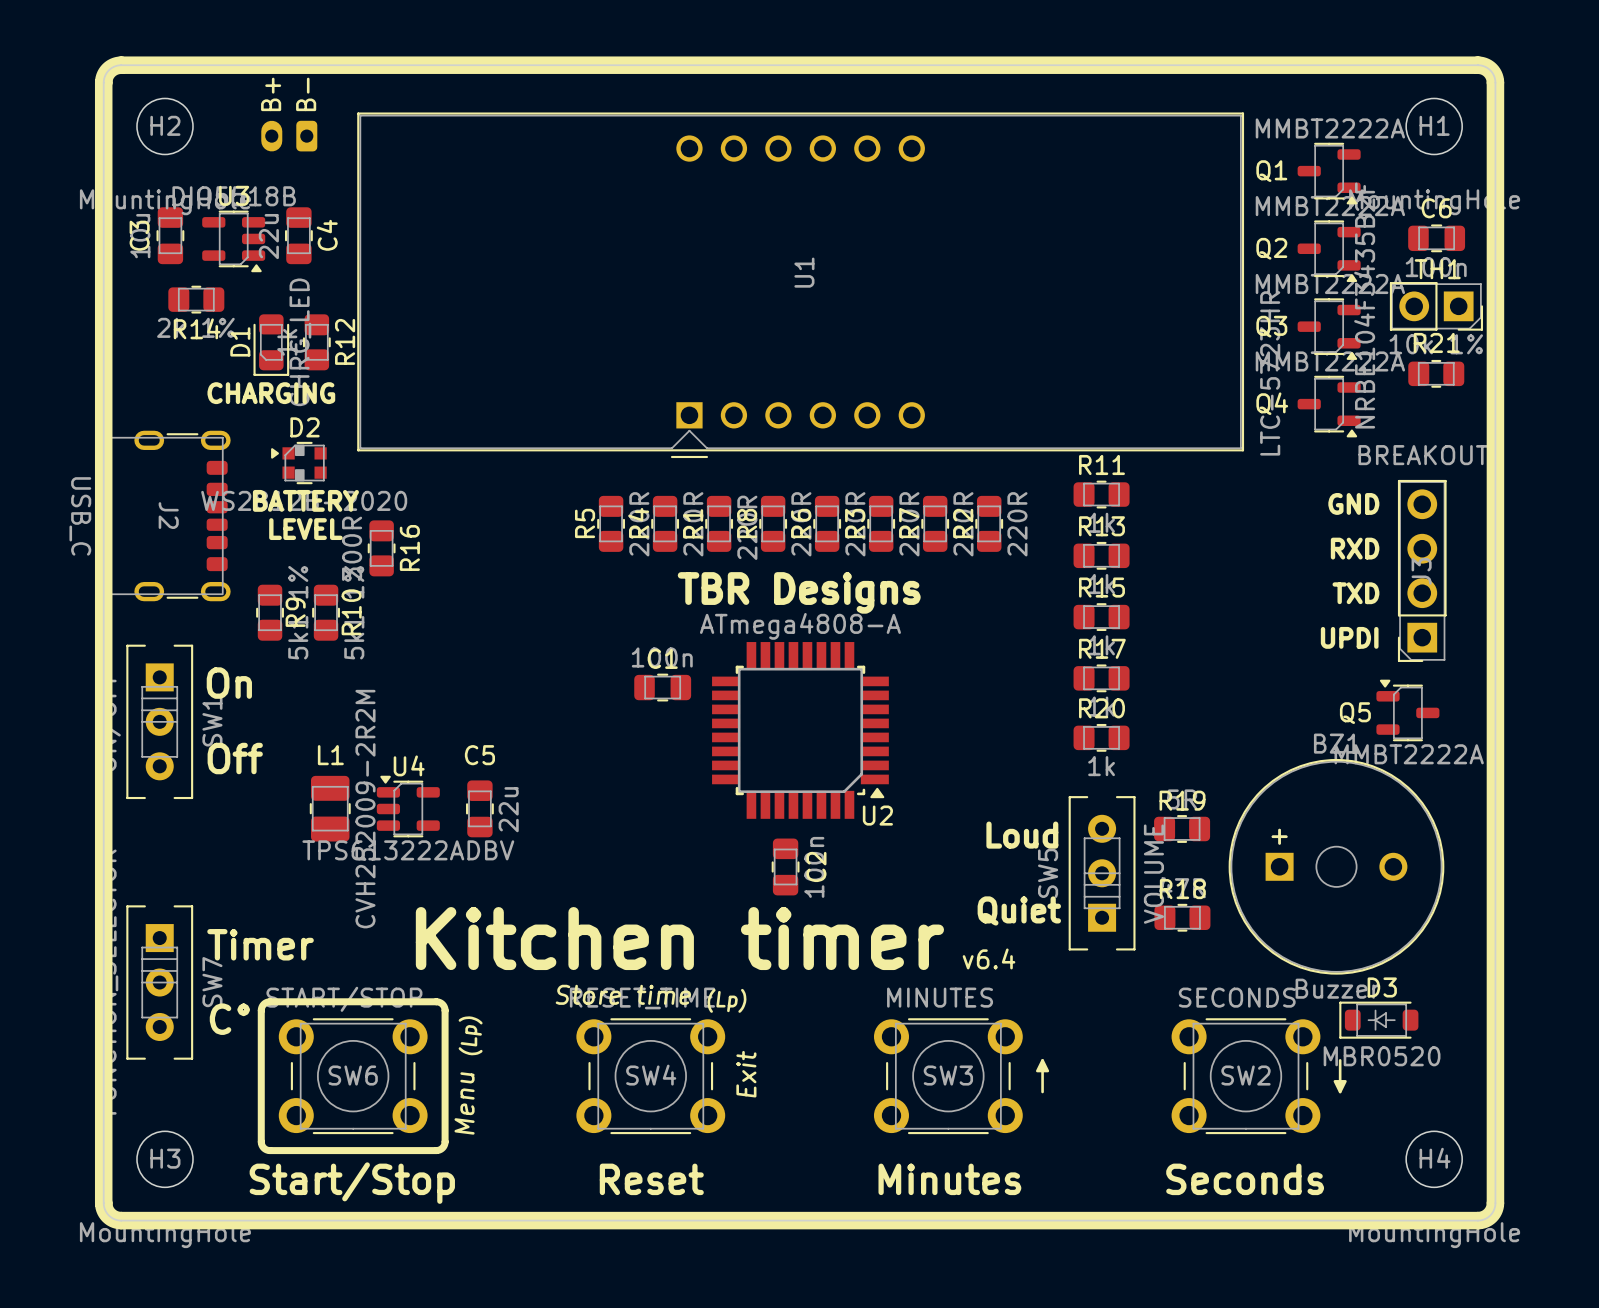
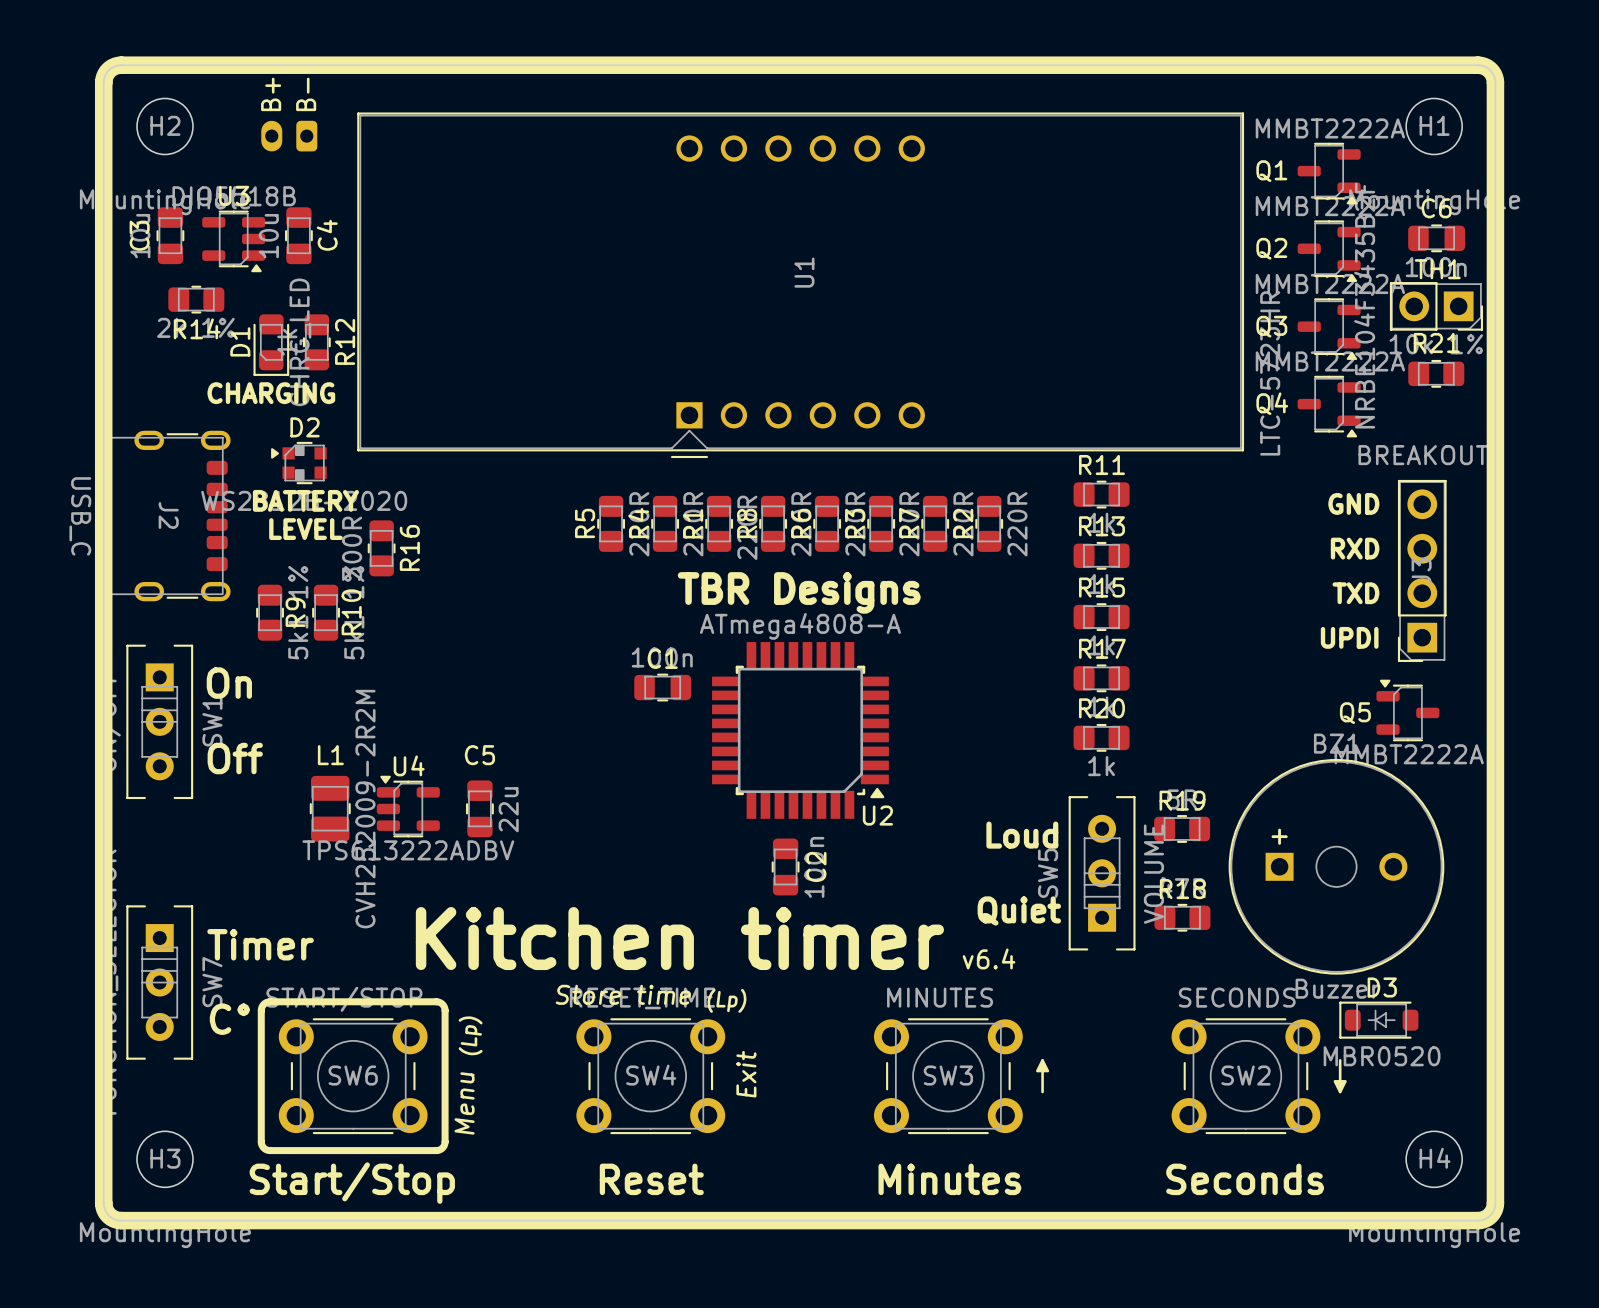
C4 value: 22u (268, 236) -> 10u (268, 236)

